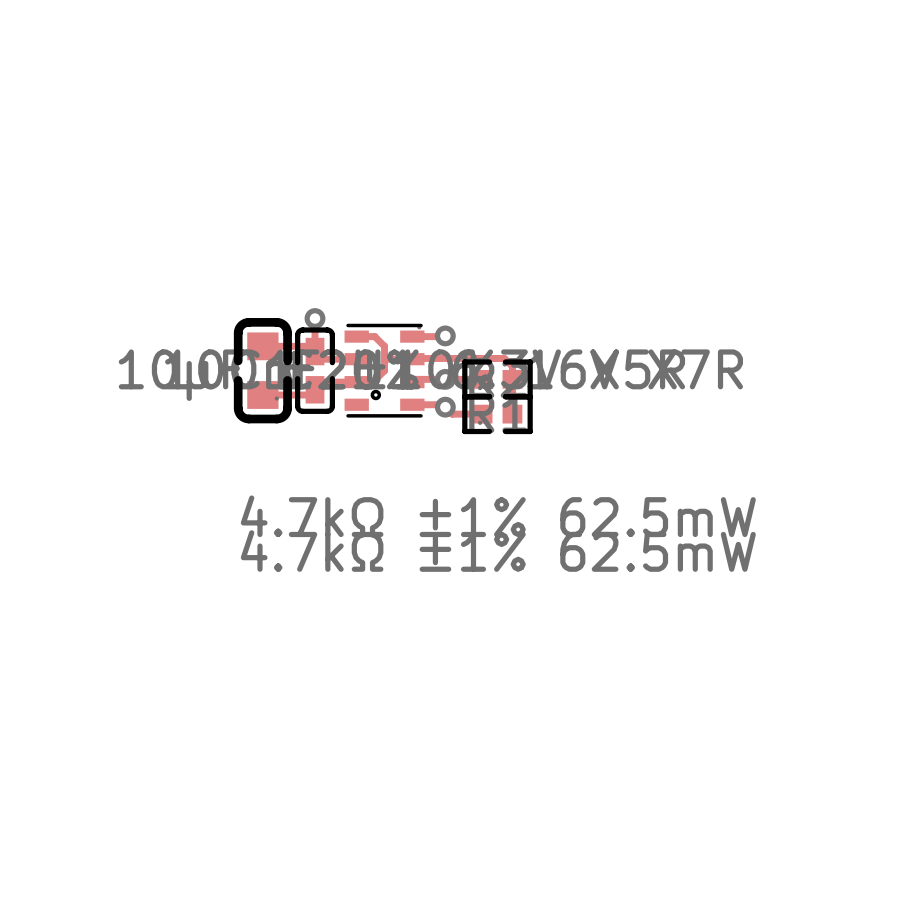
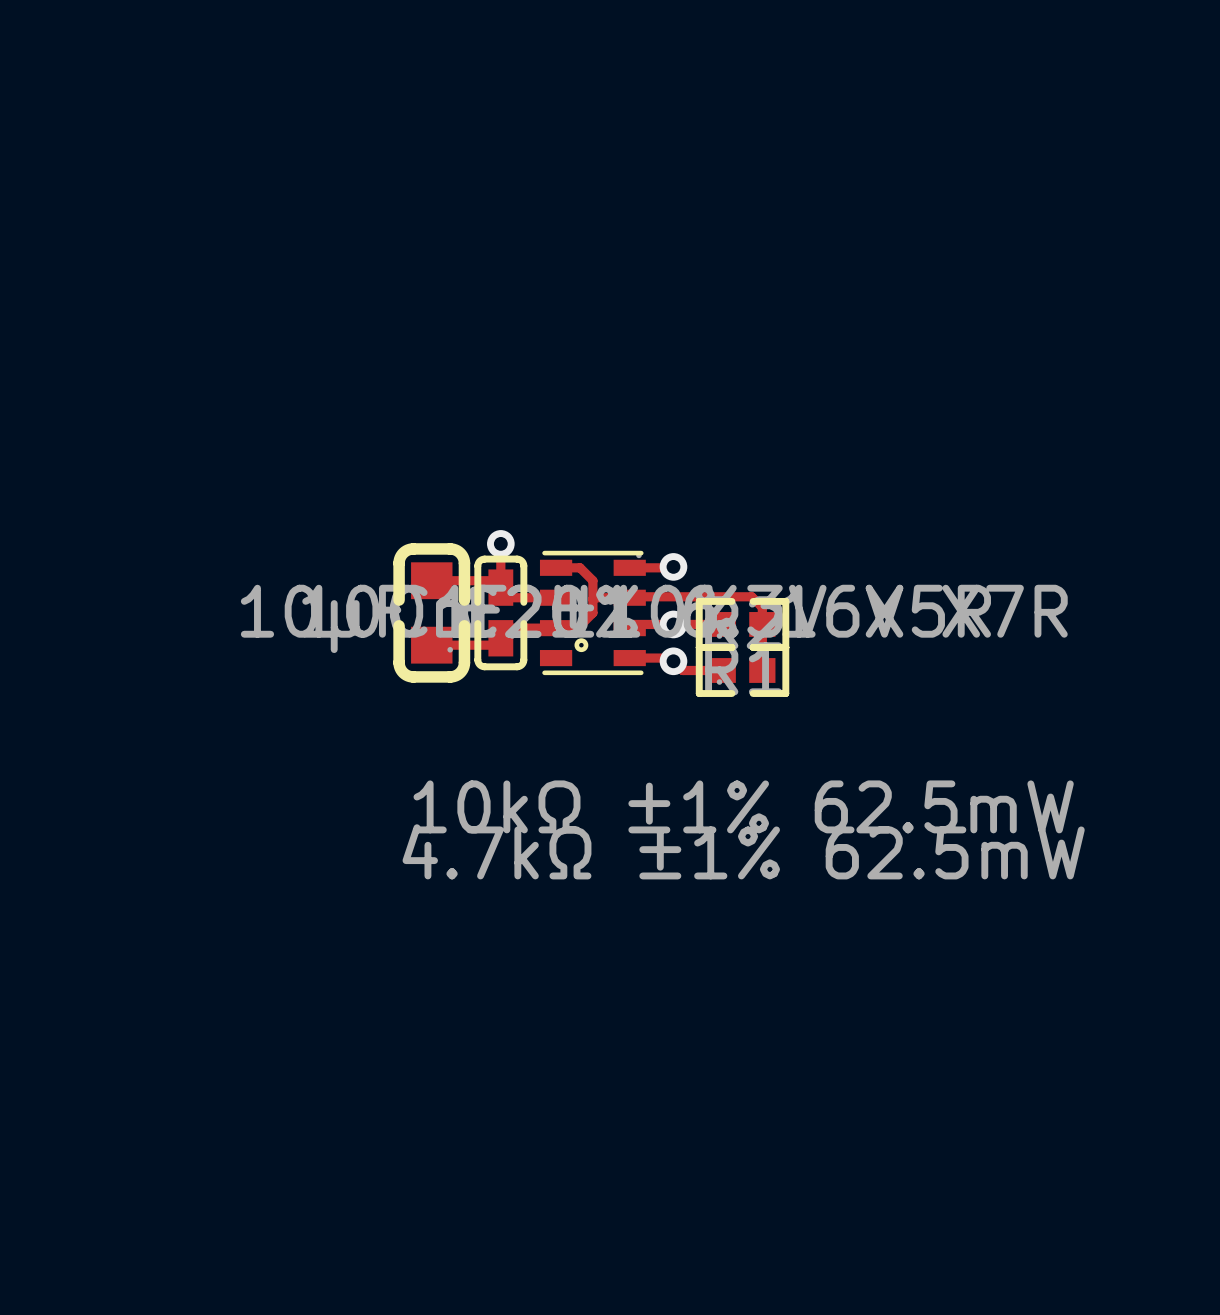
part value: 4.7kΩ ±1% 62.5mW (498, 516) -> 10kΩ ±1% 62.5mW (743, 806)

